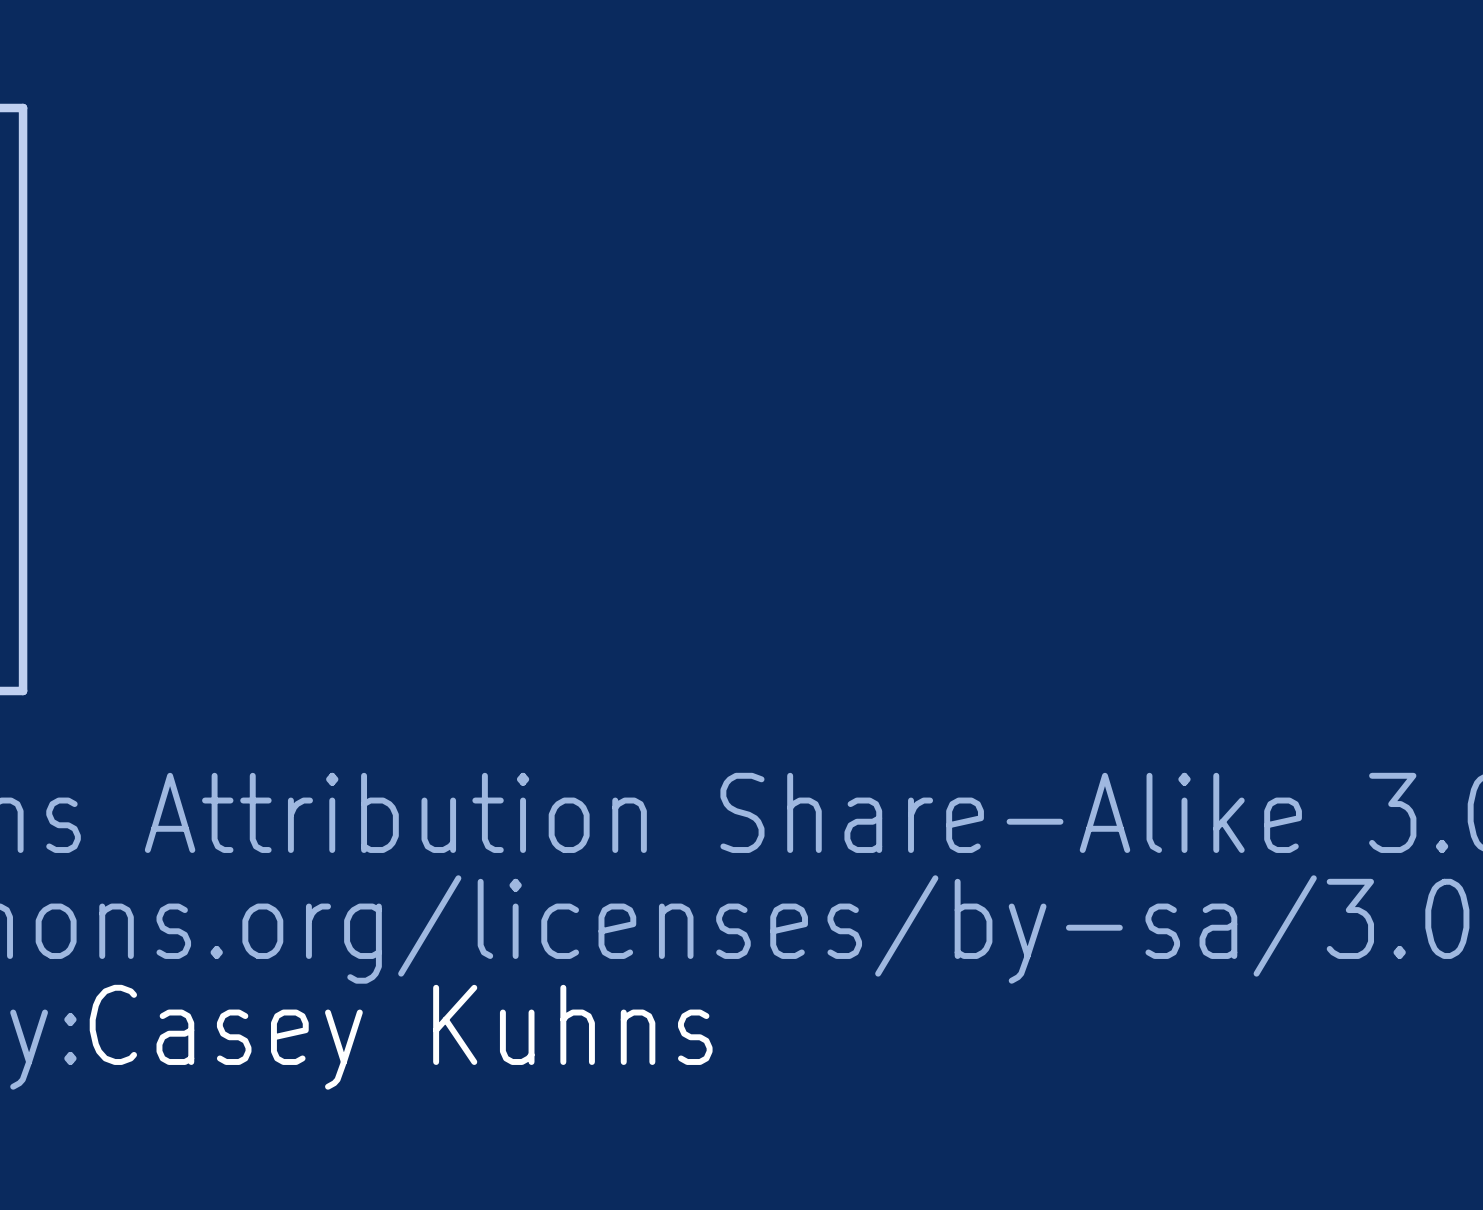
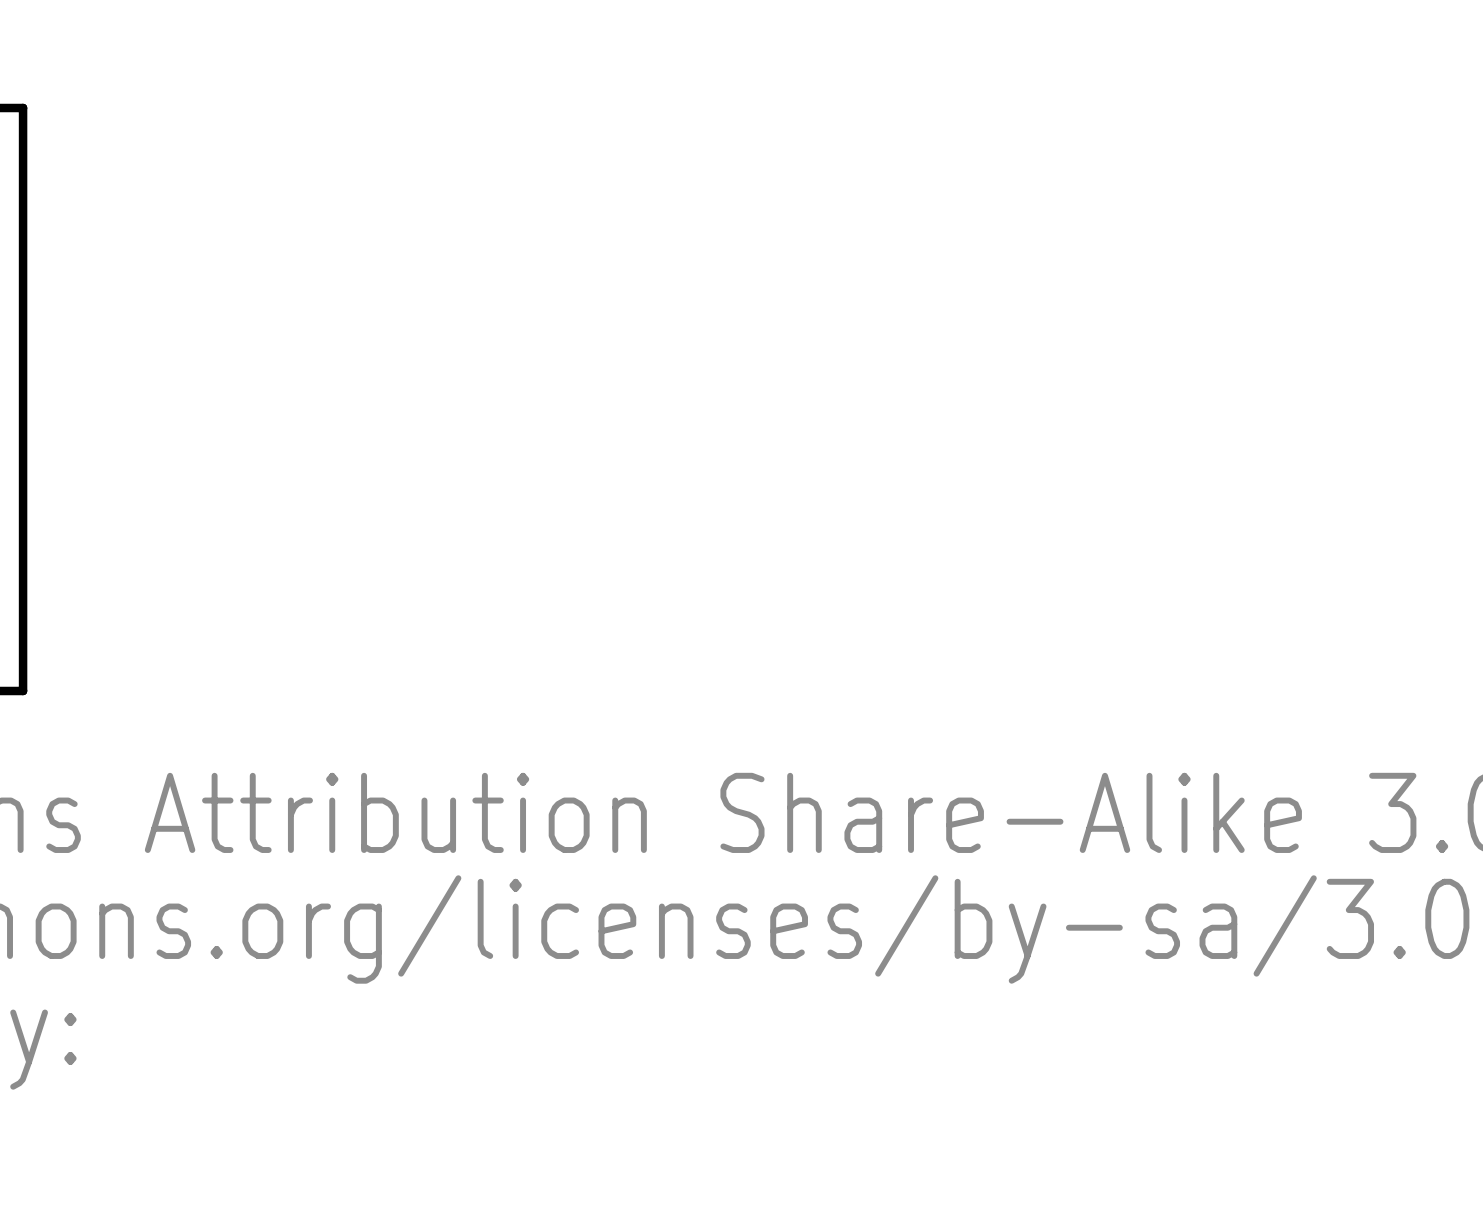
text: Casey Kuhns (401, 1037) -> none

